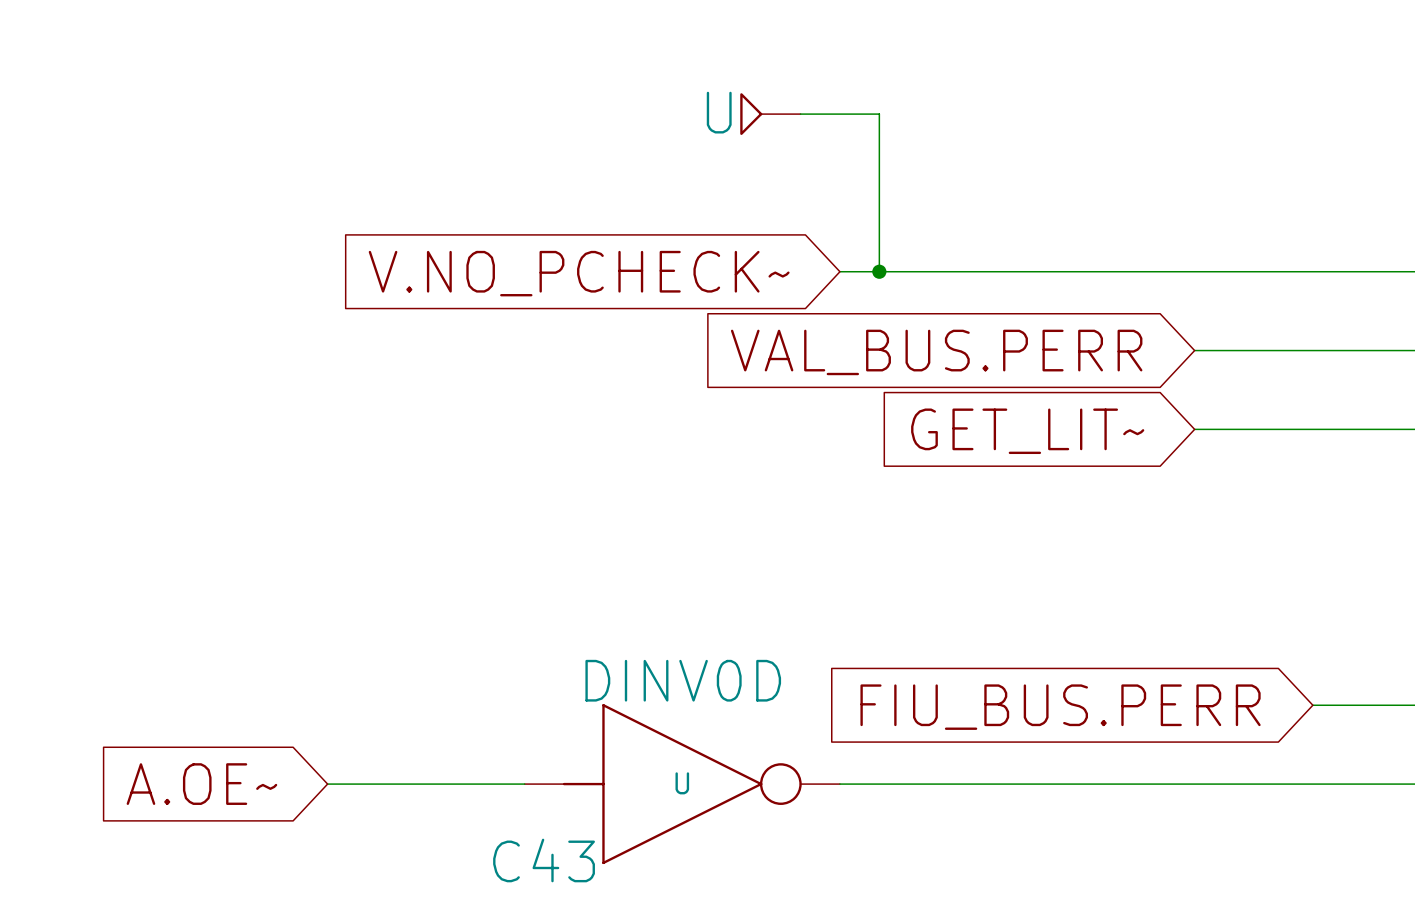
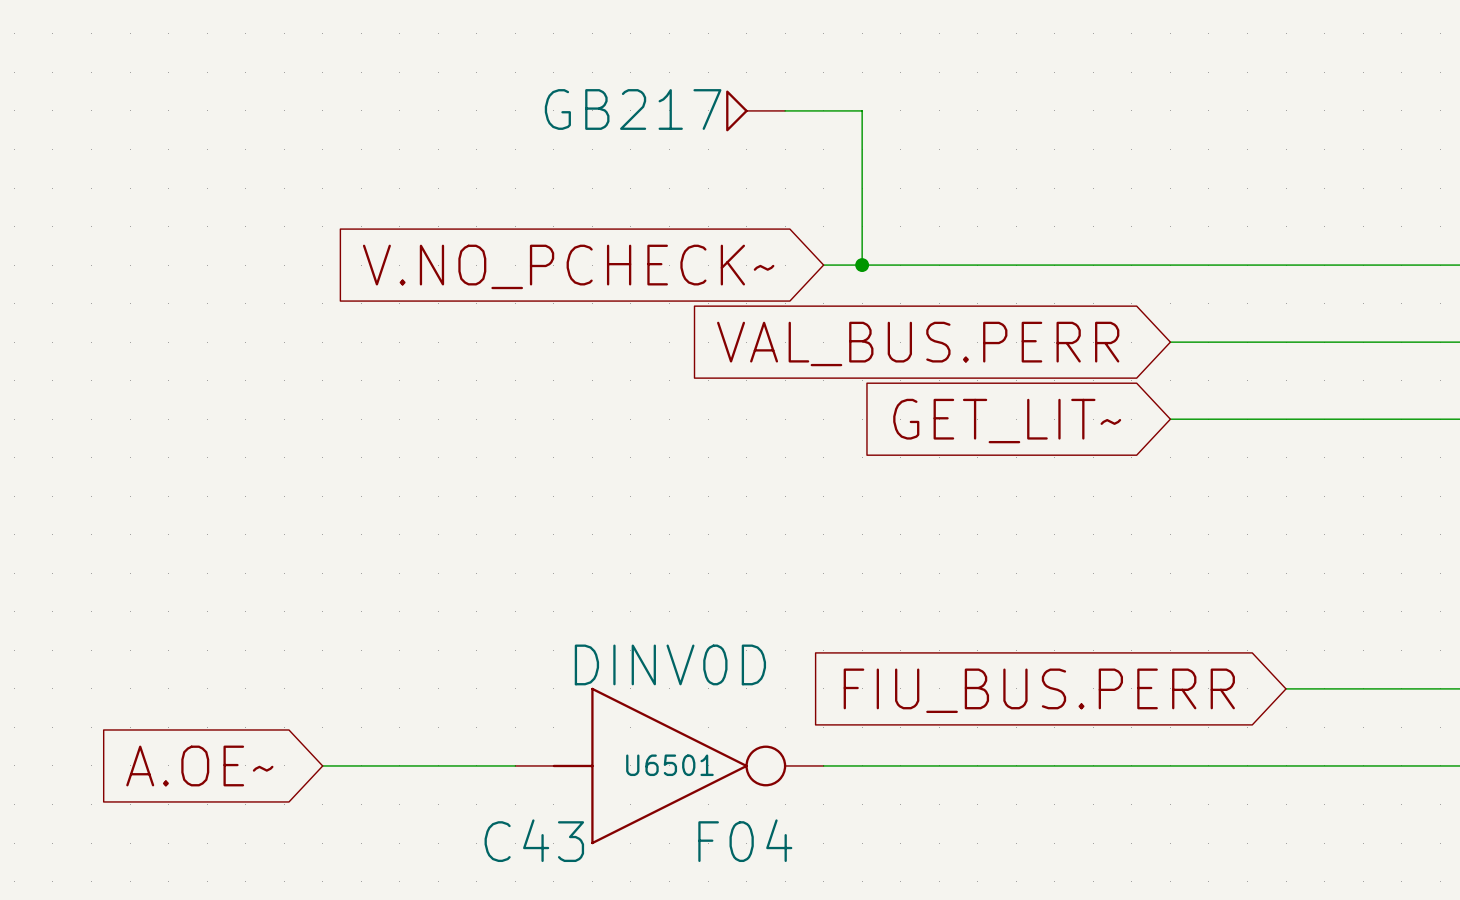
U name: U (719, 112) -> GB217 (633, 109)
U name: U (682, 783) -> U6501 (669, 765)
U value: none -> F04 (745, 840)

